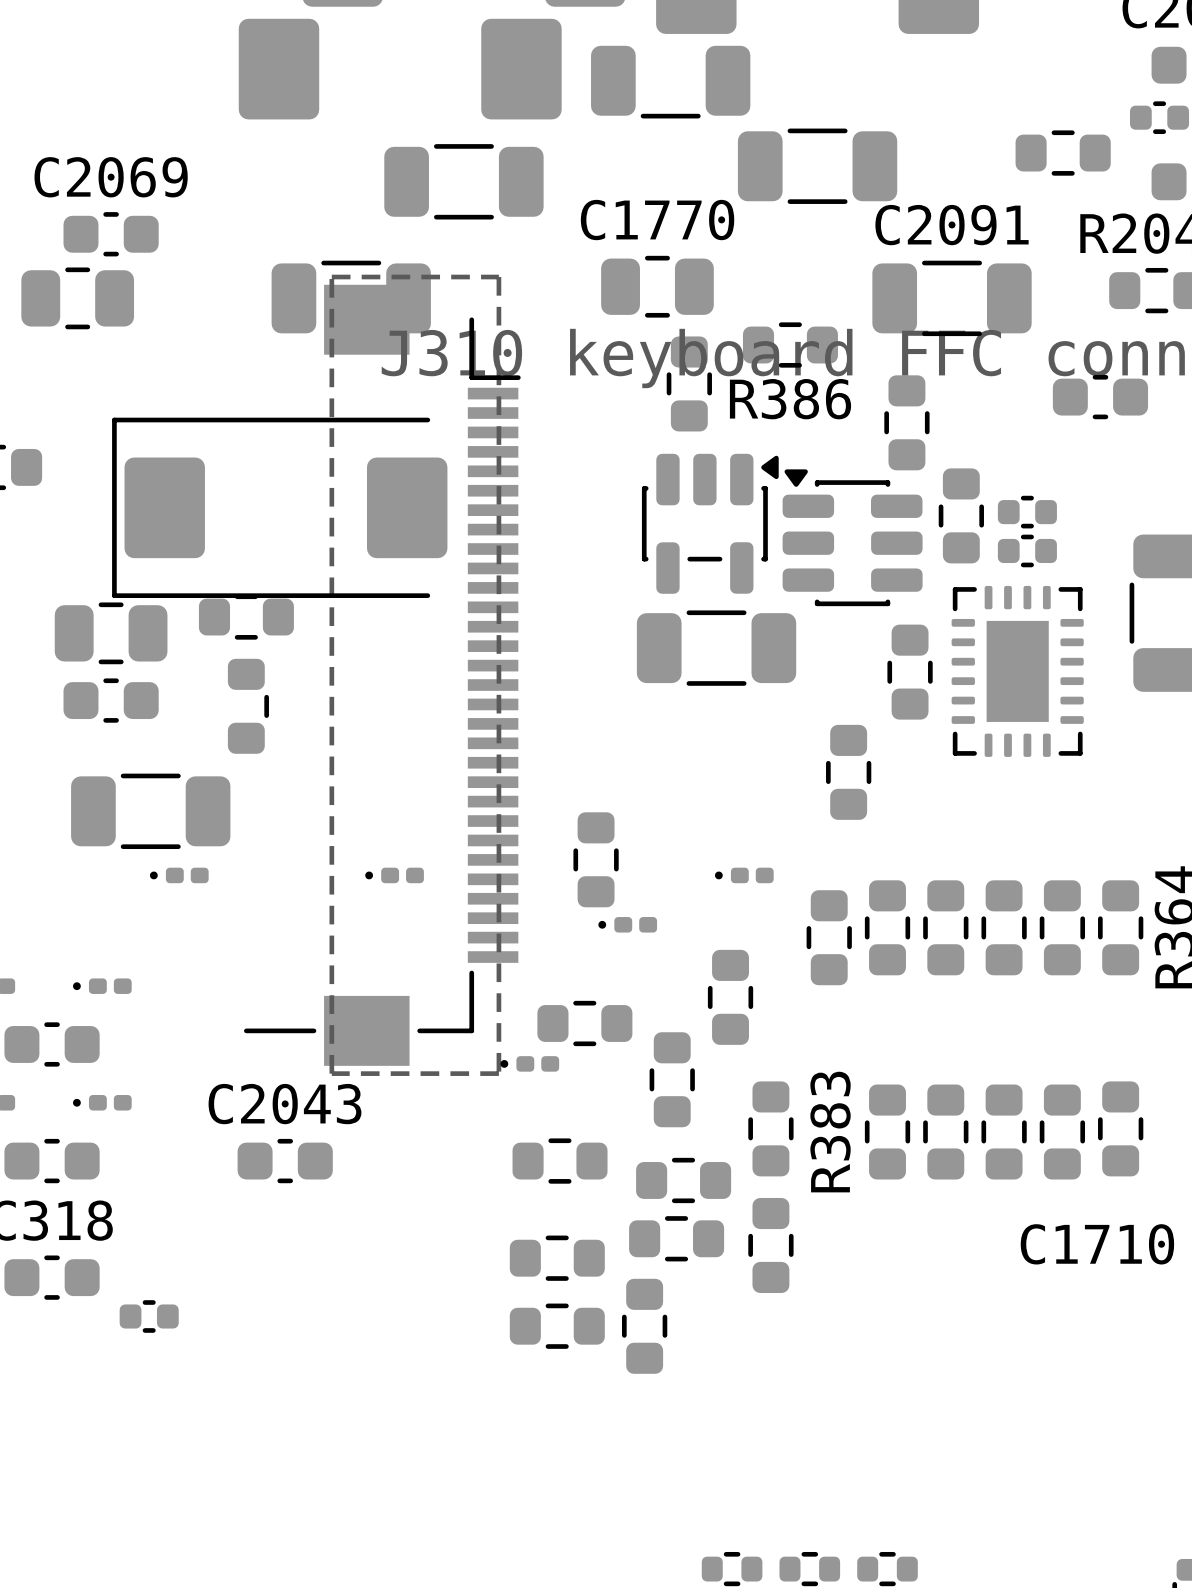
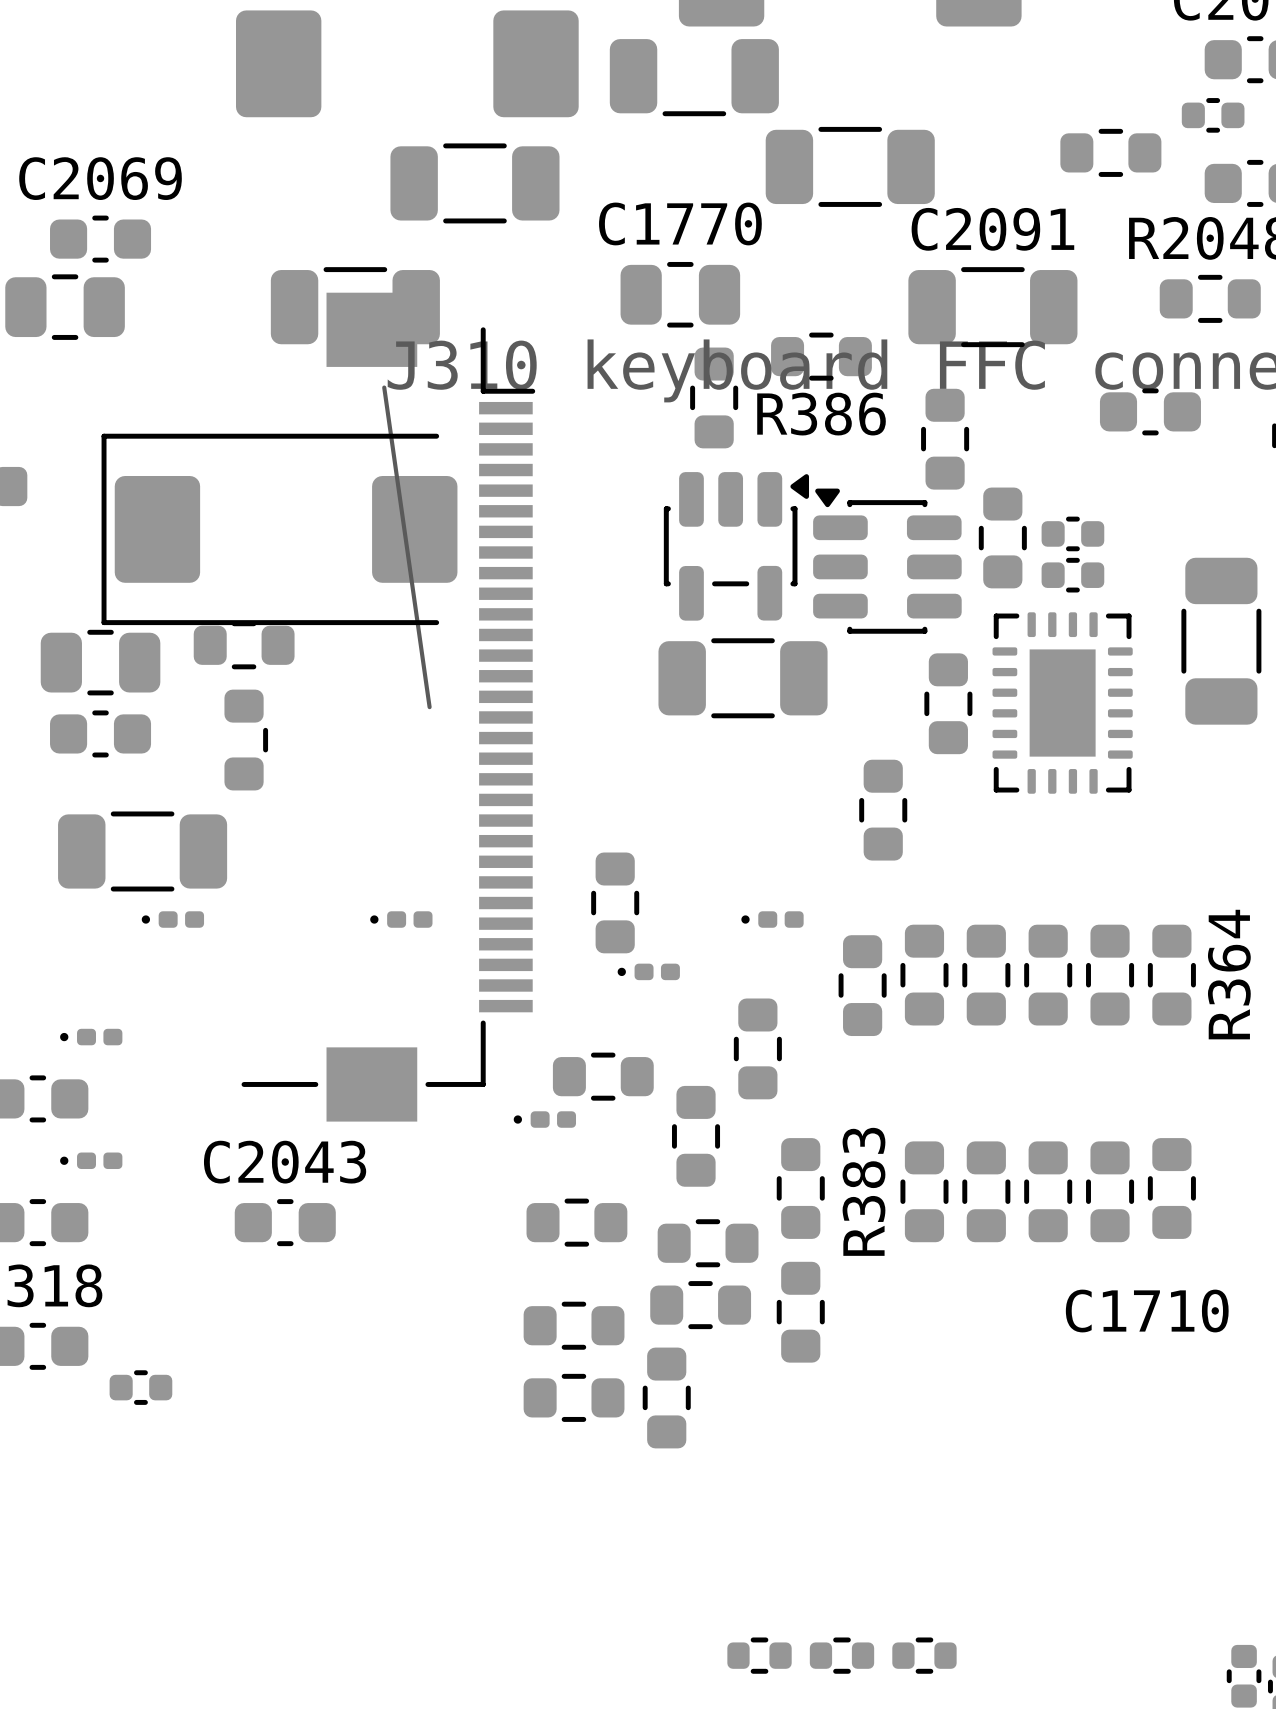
line: (331, 277) (498, 277) (498, 1073) (331, 1073) (331, 277) -> none
line: none -> (384, 387) (429, 707)

